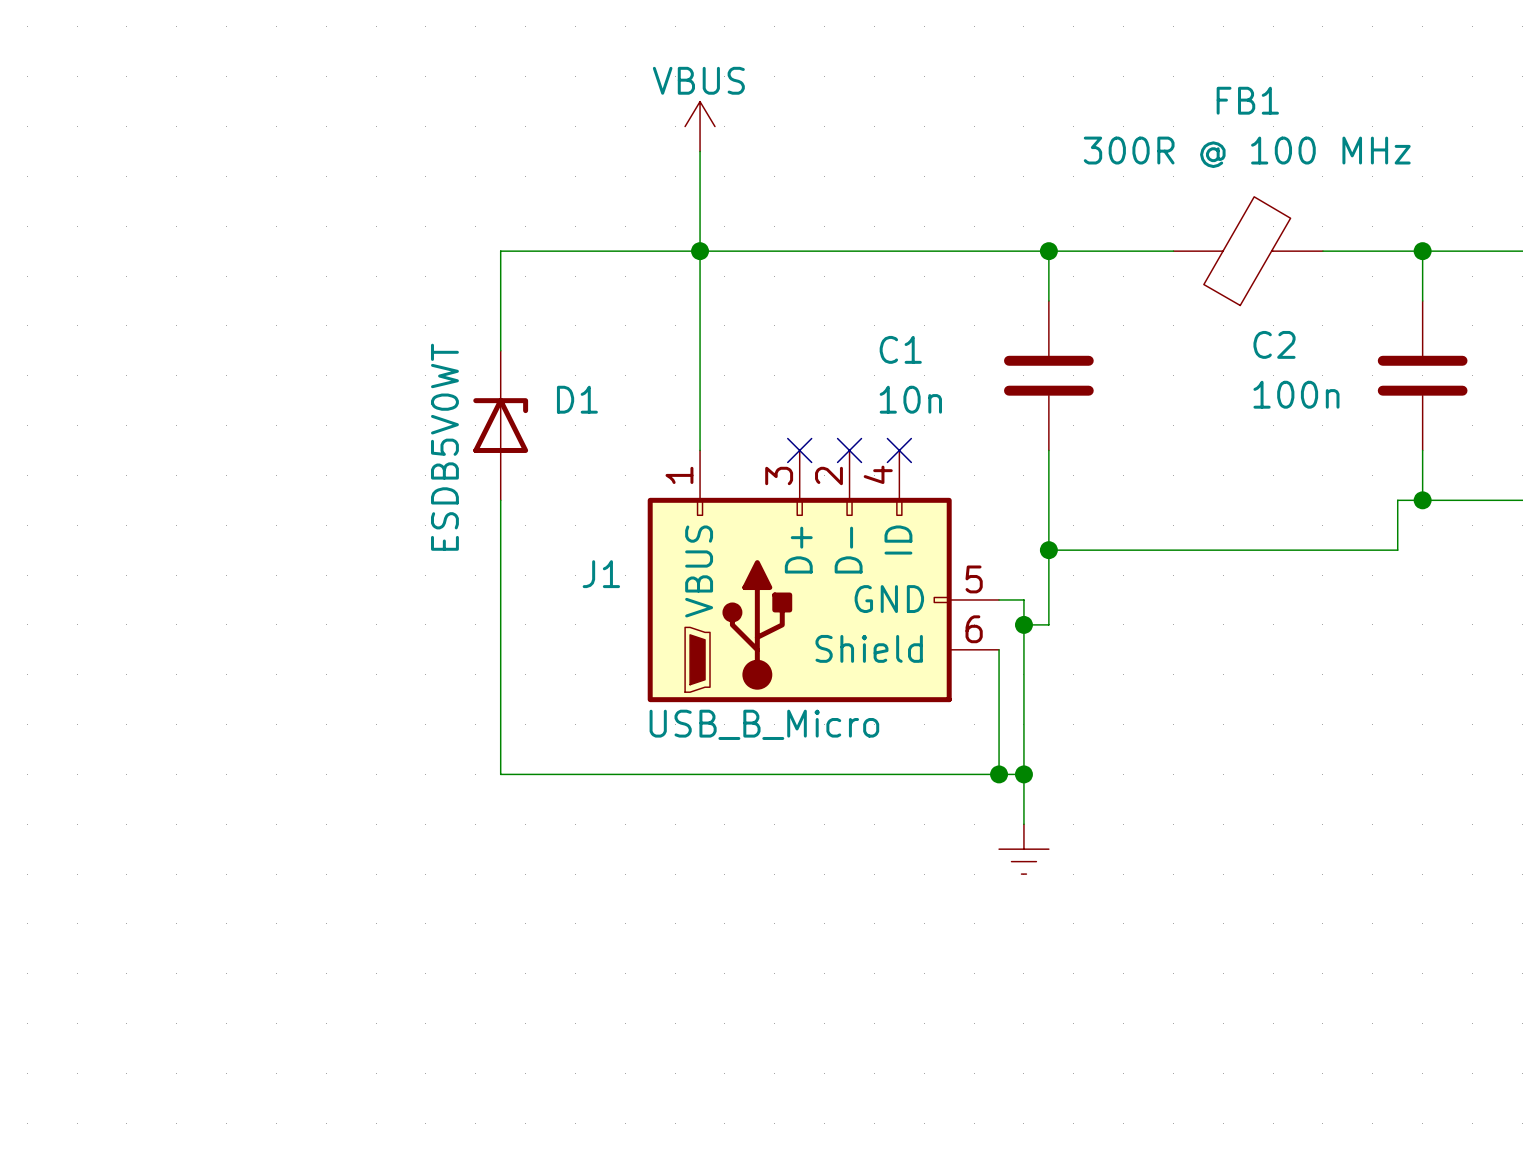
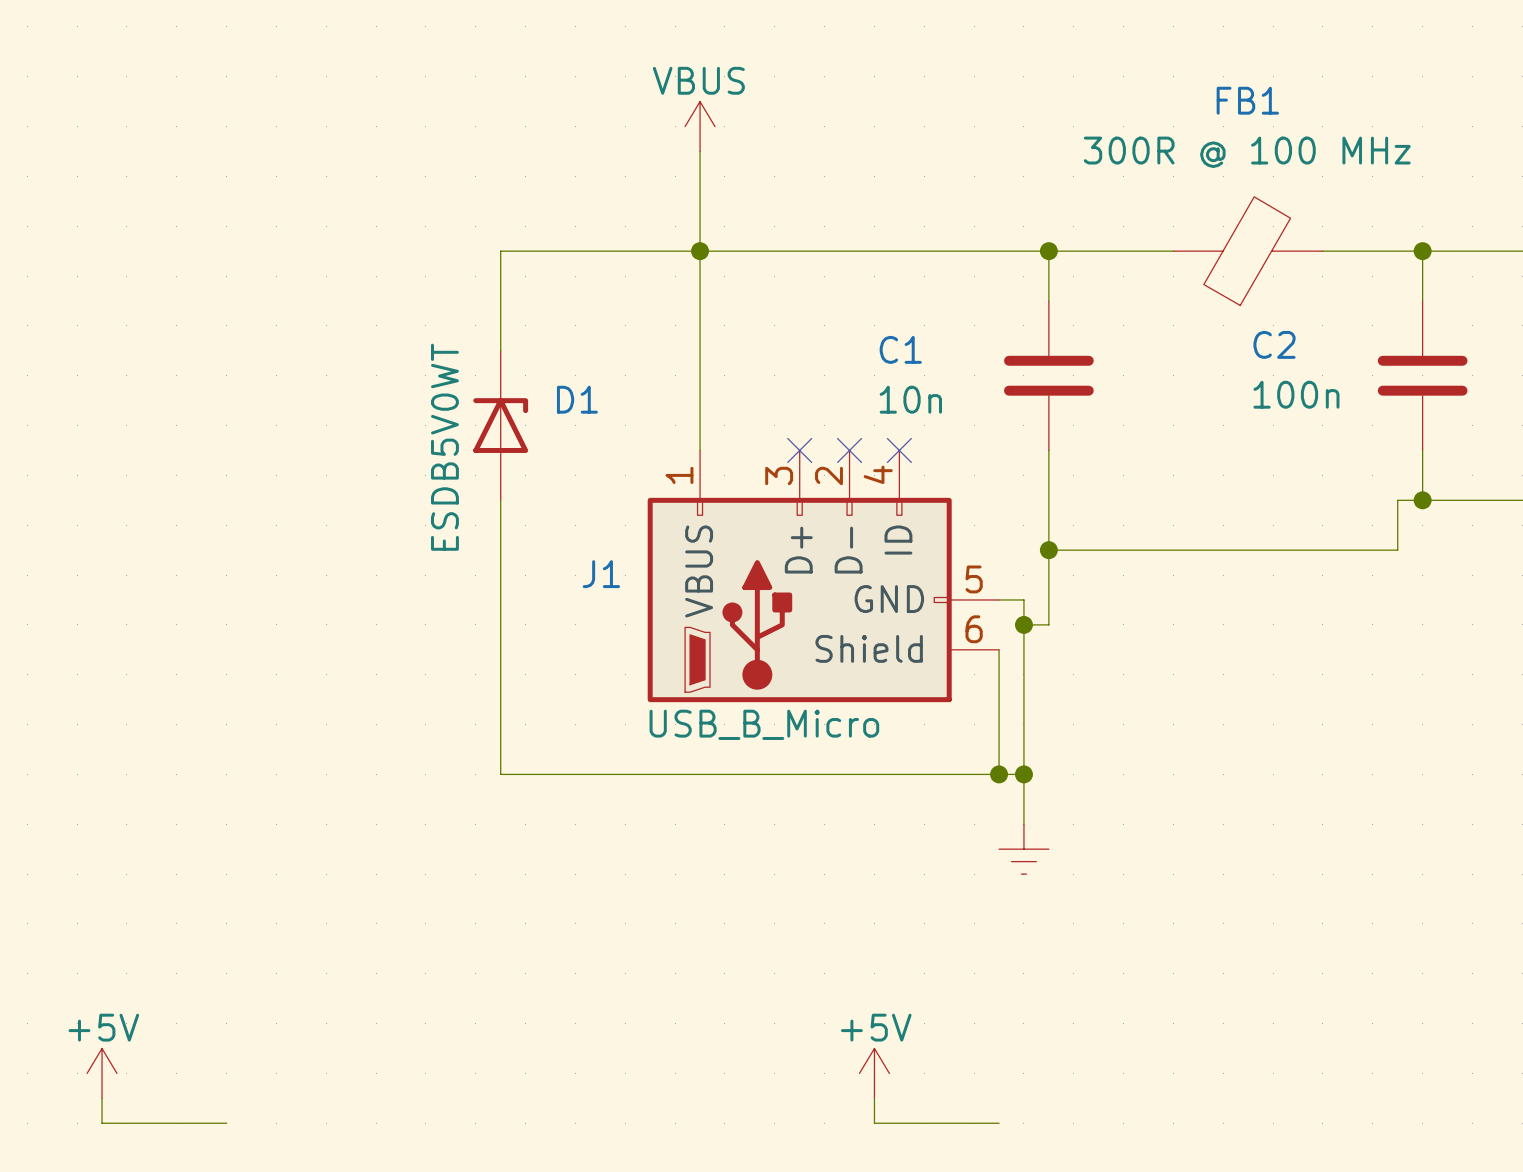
power symbol: none -> +5V (102, 1073)
power symbol: none -> +5V (874, 1073)
wire: none -> (102, 1098) (102, 1123) (226, 1123)
wire: none -> (874, 1098) (874, 1123) (999, 1123)

